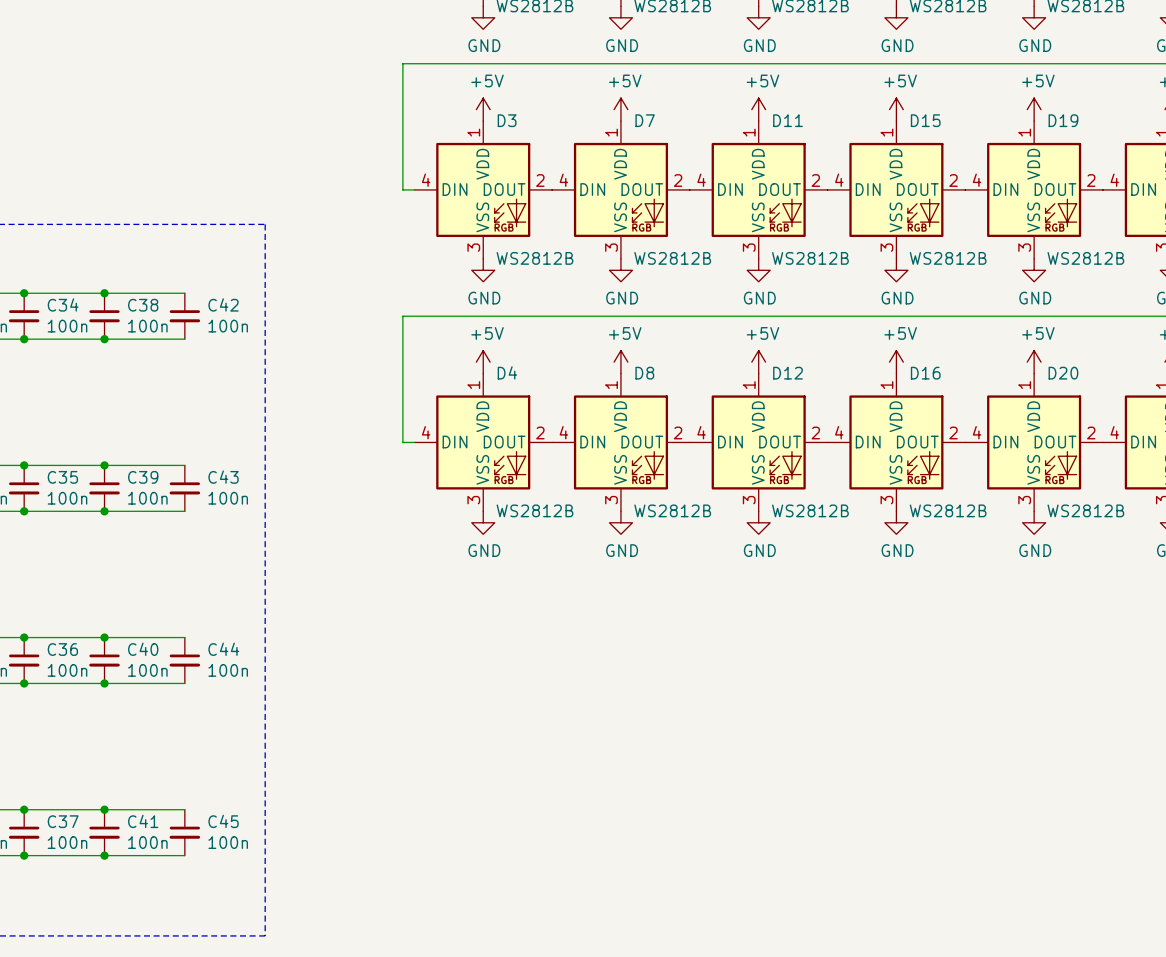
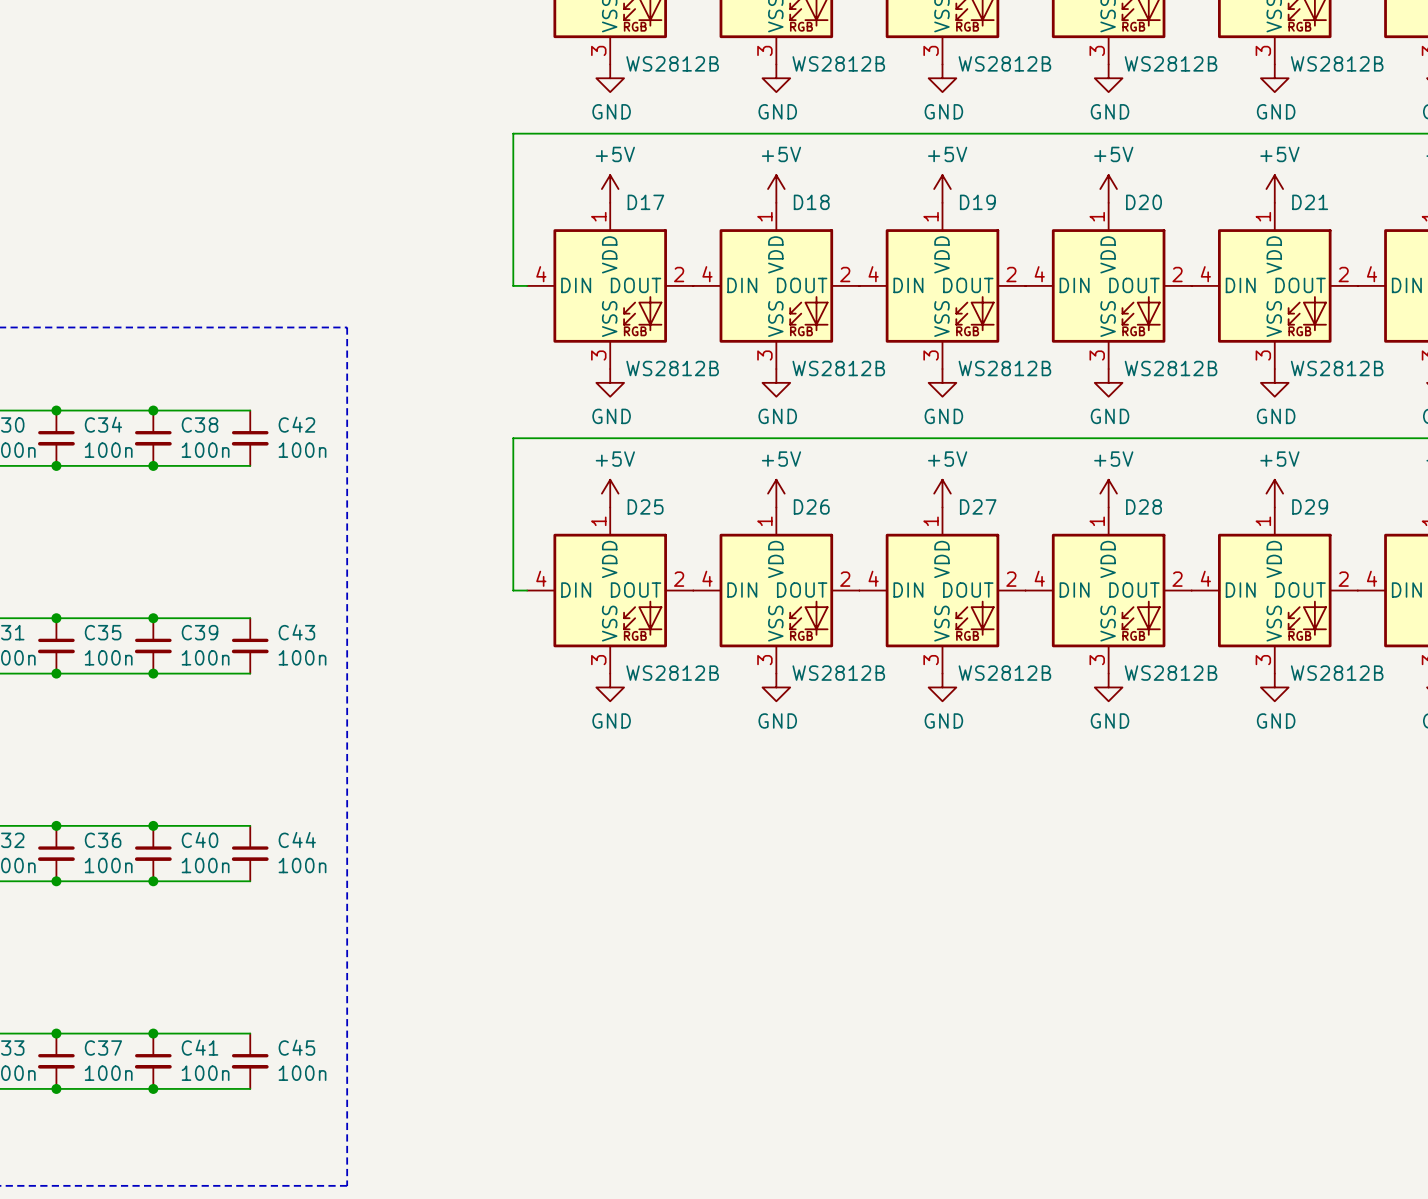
D3 name: D3 (507, 120) -> D17 (645, 202)
D7 name: D7 (645, 120) -> D18 (811, 202)
D11 name: D11 (788, 120) -> D19 (977, 202)
D15 name: D15 (925, 120) -> D20 (1144, 202)
D19 name: D19 (1063, 120) -> D21 (1310, 202)
D4 name: D4 (507, 372) -> D25 (645, 506)
D8 name: D8 (644, 373) -> D26 (811, 506)
D12 name: D12 (788, 373) -> D27 (978, 506)
D16 name: D16 (925, 373) -> D28 (1144, 506)
D20 name: D20 (1063, 373) -> D29 (1310, 506)

